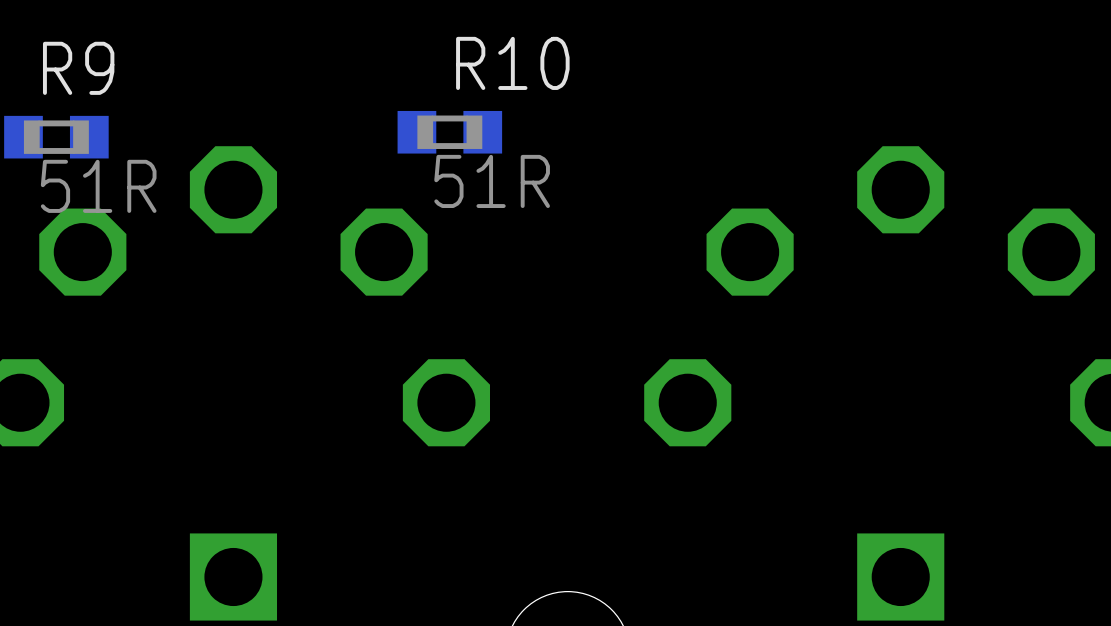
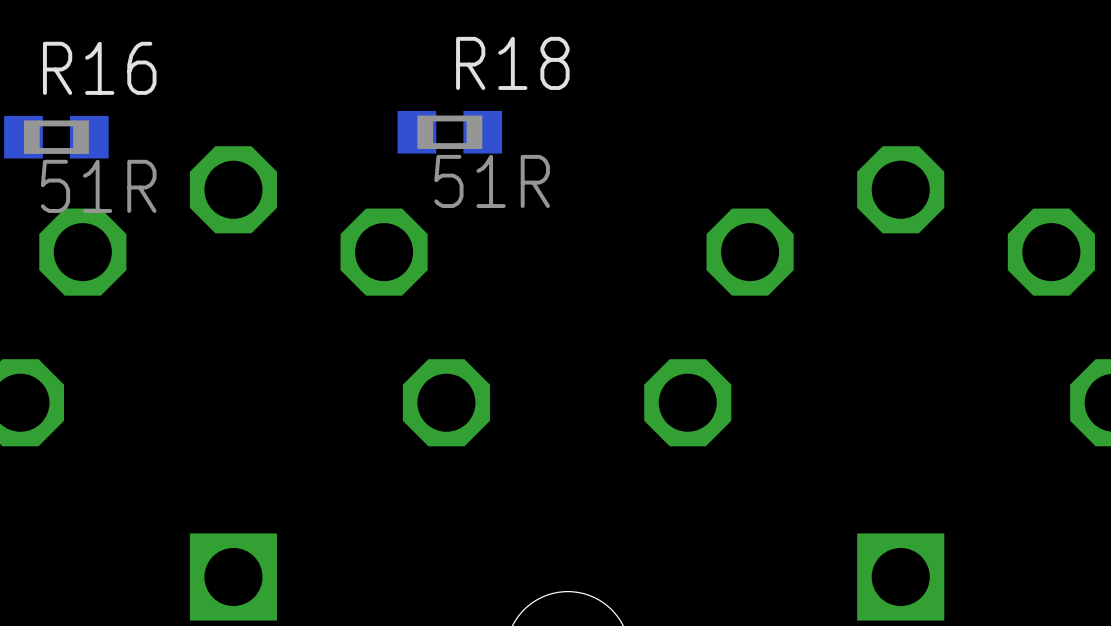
R10 name: R10 (512, 63) -> R18 (512, 63)
R9 name: R9 (78, 68) -> R16 (99, 68)

